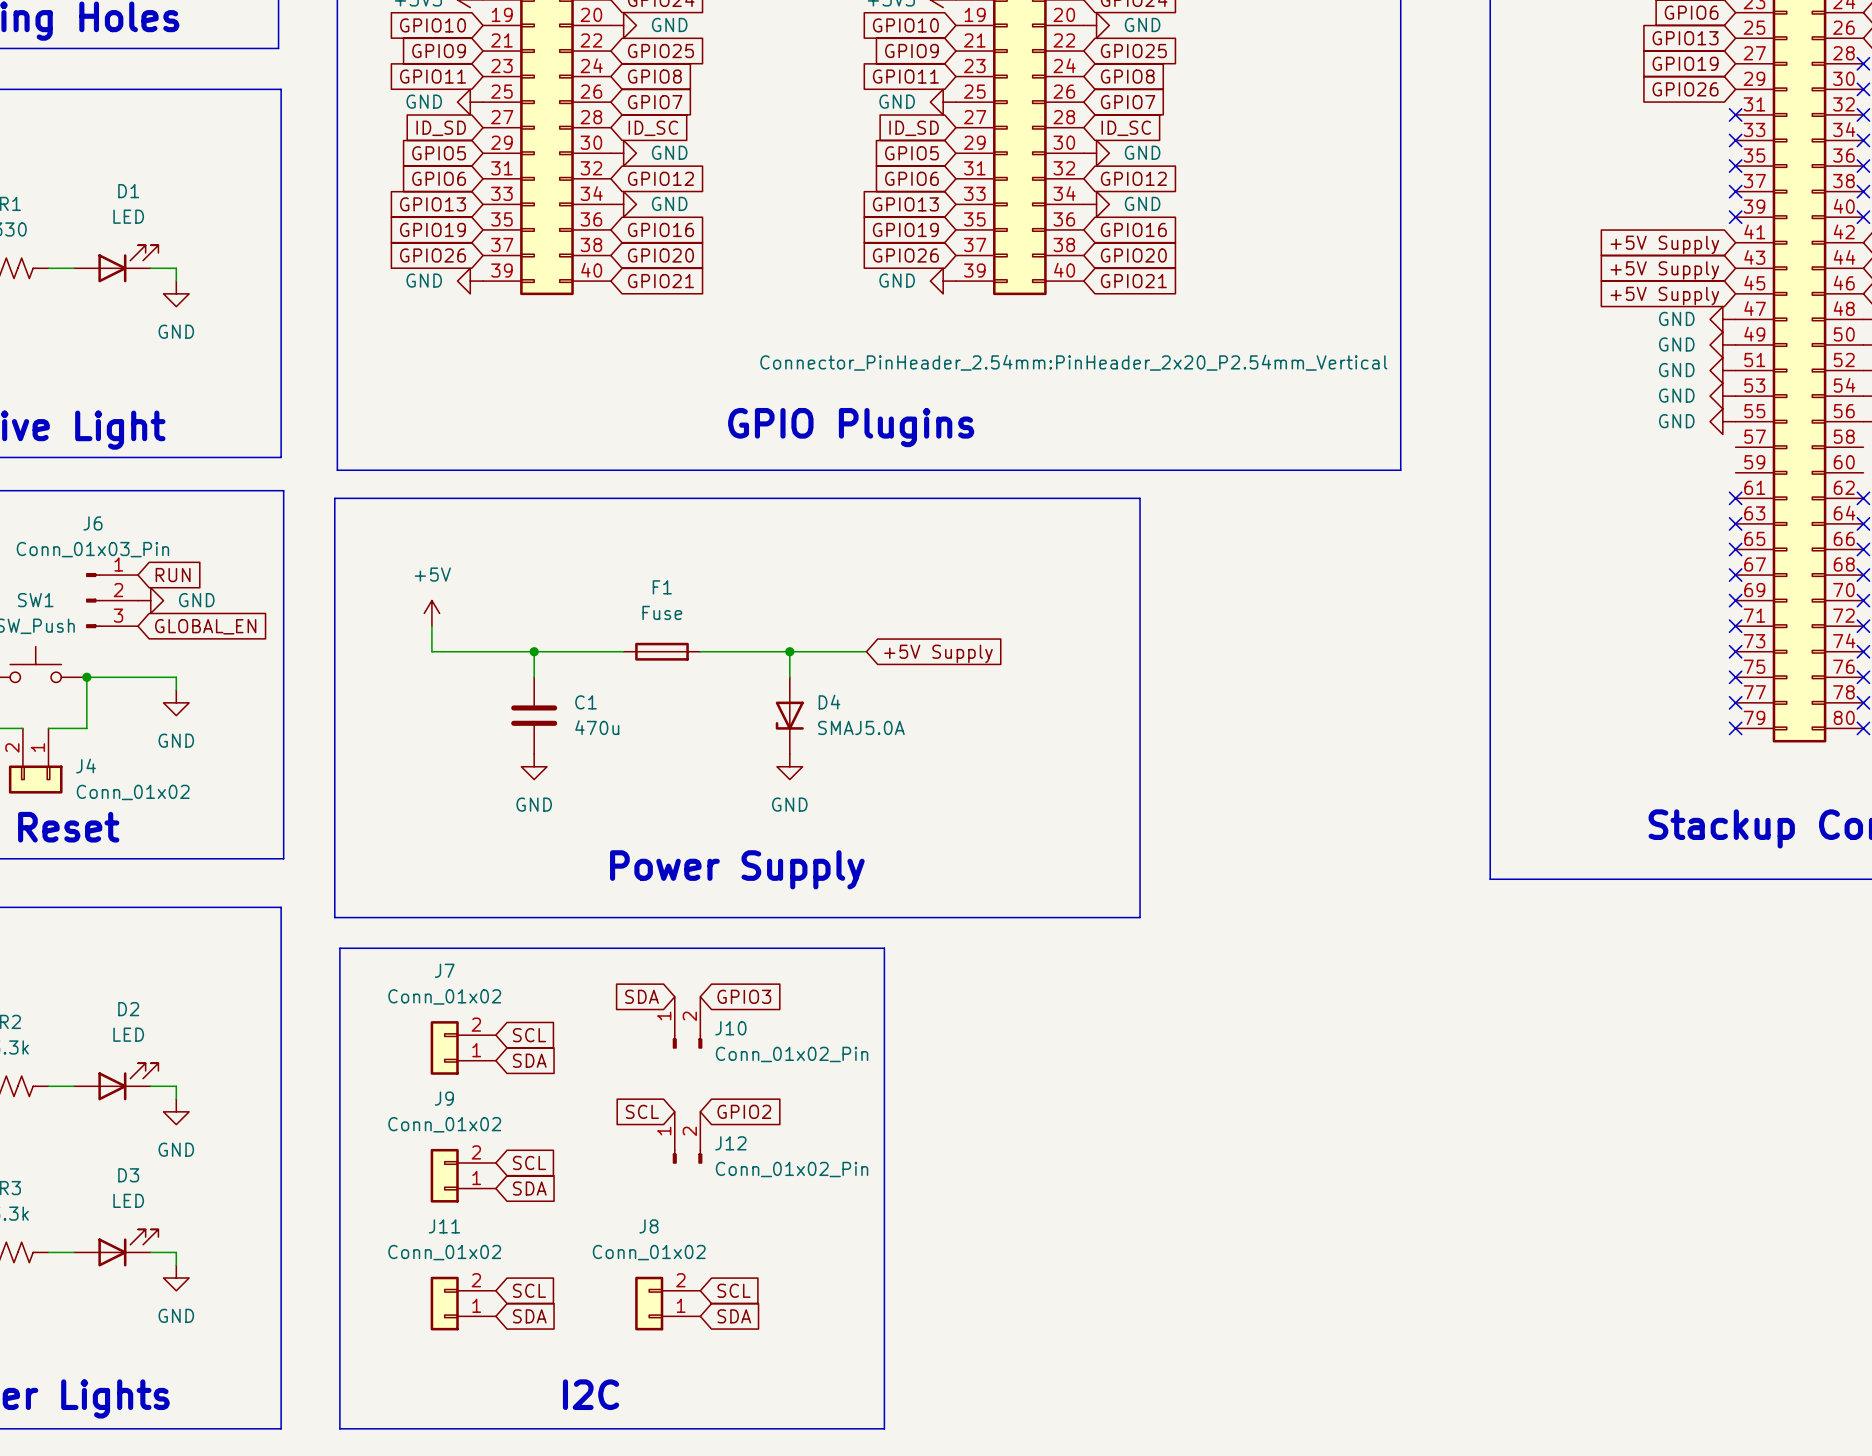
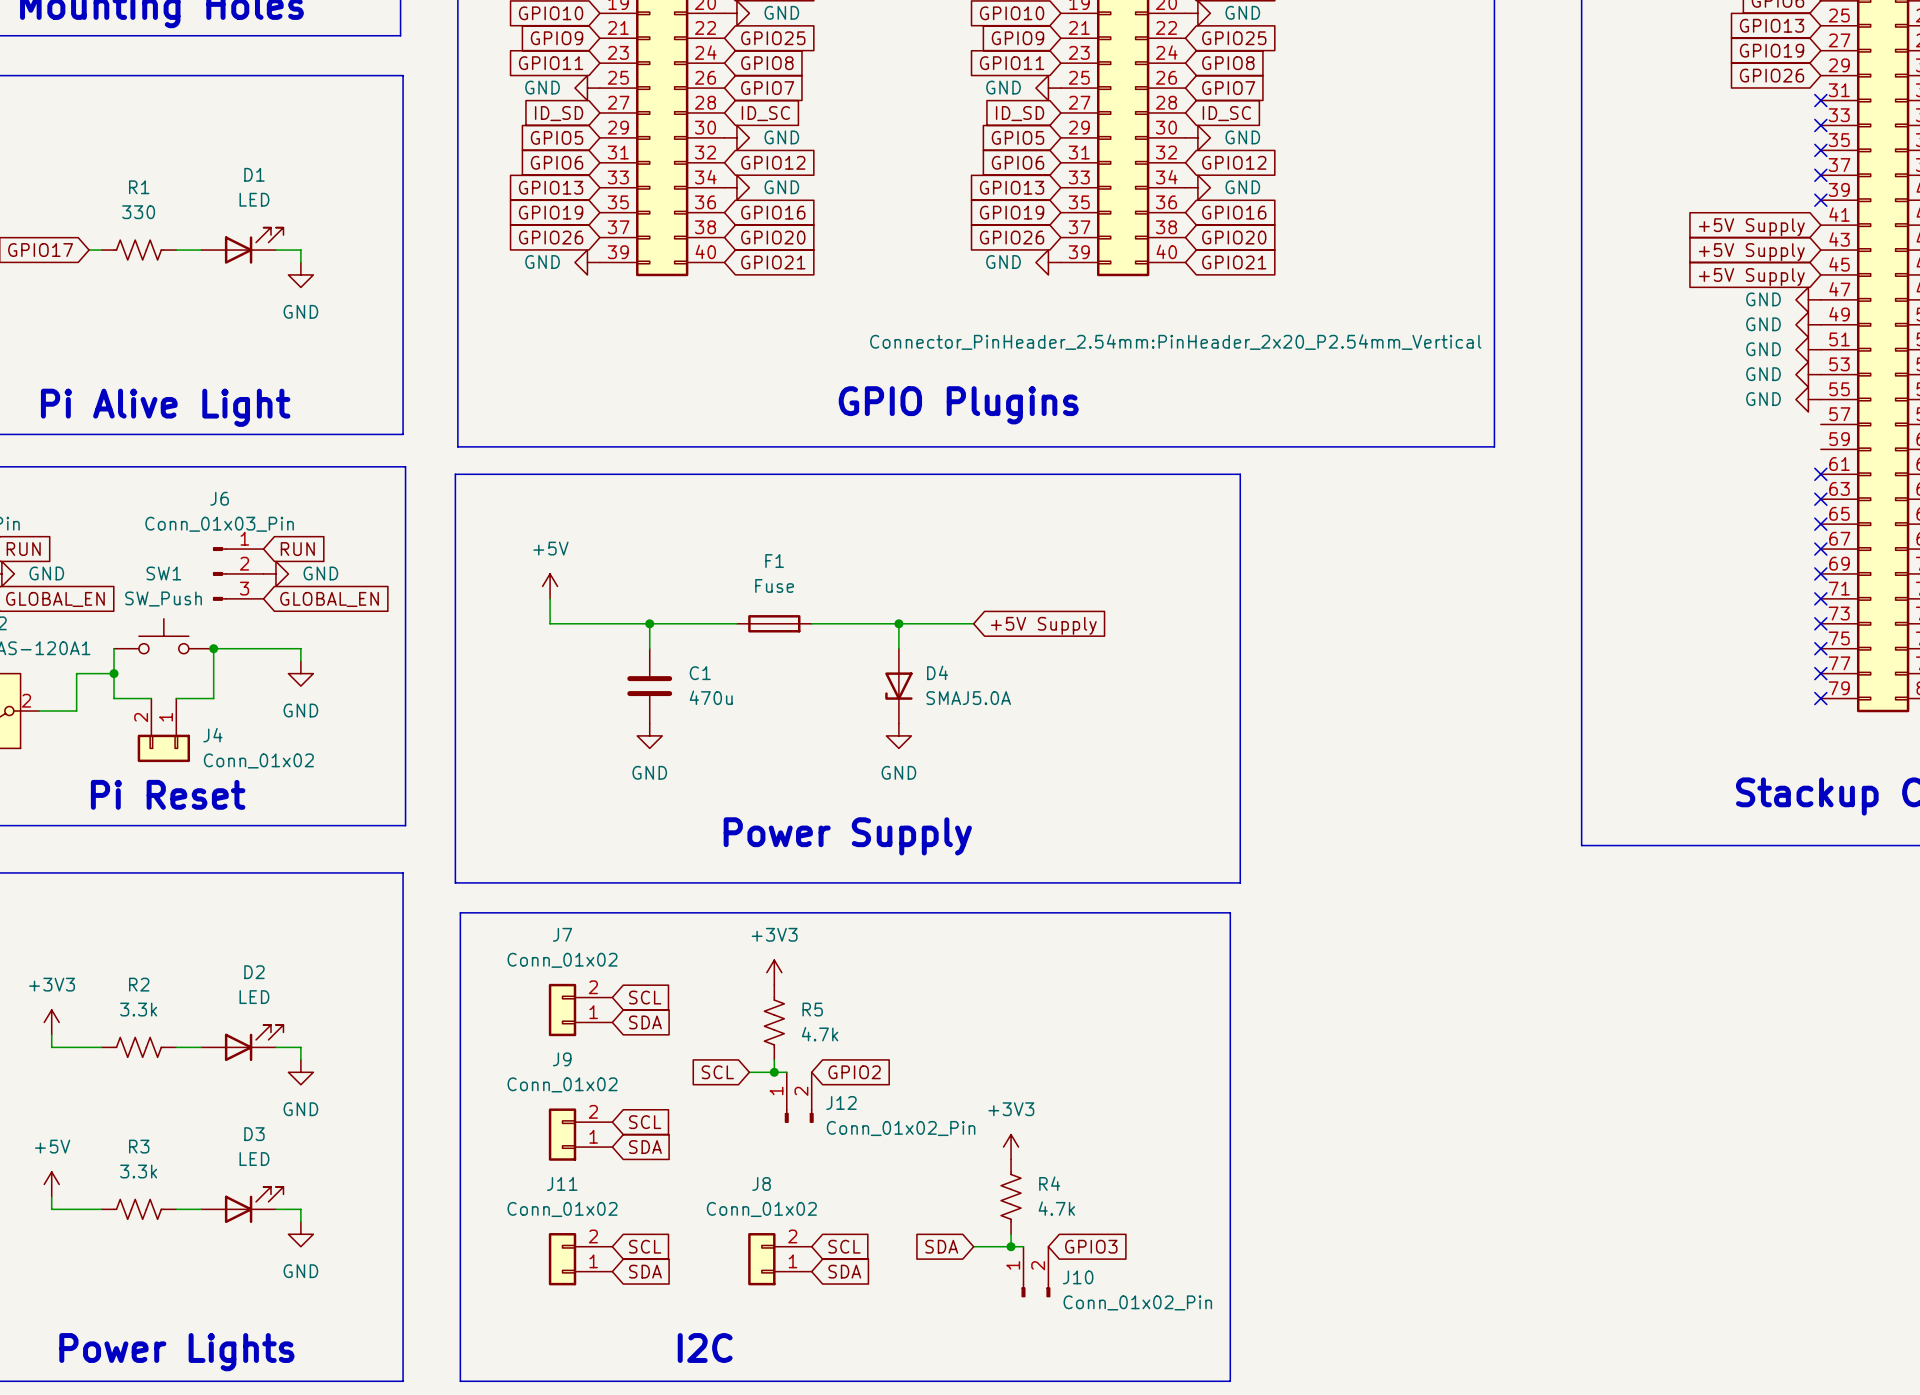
line: (884, 948) (884, 1428) -> (991, 912) (1230, 912) (1230, 1381) (991, 1381)
global label: SDA (642, 996) -> none
global label: GPIO3 (744, 996) -> none
power symbol: none -> +3V3 (774, 972)
J10 position: (687, 1022) -> (1035, 1272)
R5: none -> 4.7k (774, 1022)
wire: none -> (774, 1059) (774, 1072)
wire: none -> (749, 1072) (786, 1072)
global label position: SCL (642, 1111) -> SCL (717, 1072)
junction: none -> (774, 1072)
power symbol: none -> +3V3 (1011, 1147)
R4: none -> 4.7k (1011, 1196)
wire: none -> (1011, 1234) (1011, 1246)
global label: none -> SDA (941, 1246)
wire: none -> (973, 1246) (1023, 1246)
junction: none -> (1011, 1246)
global label: none -> GPIO3 (1091, 1246)

